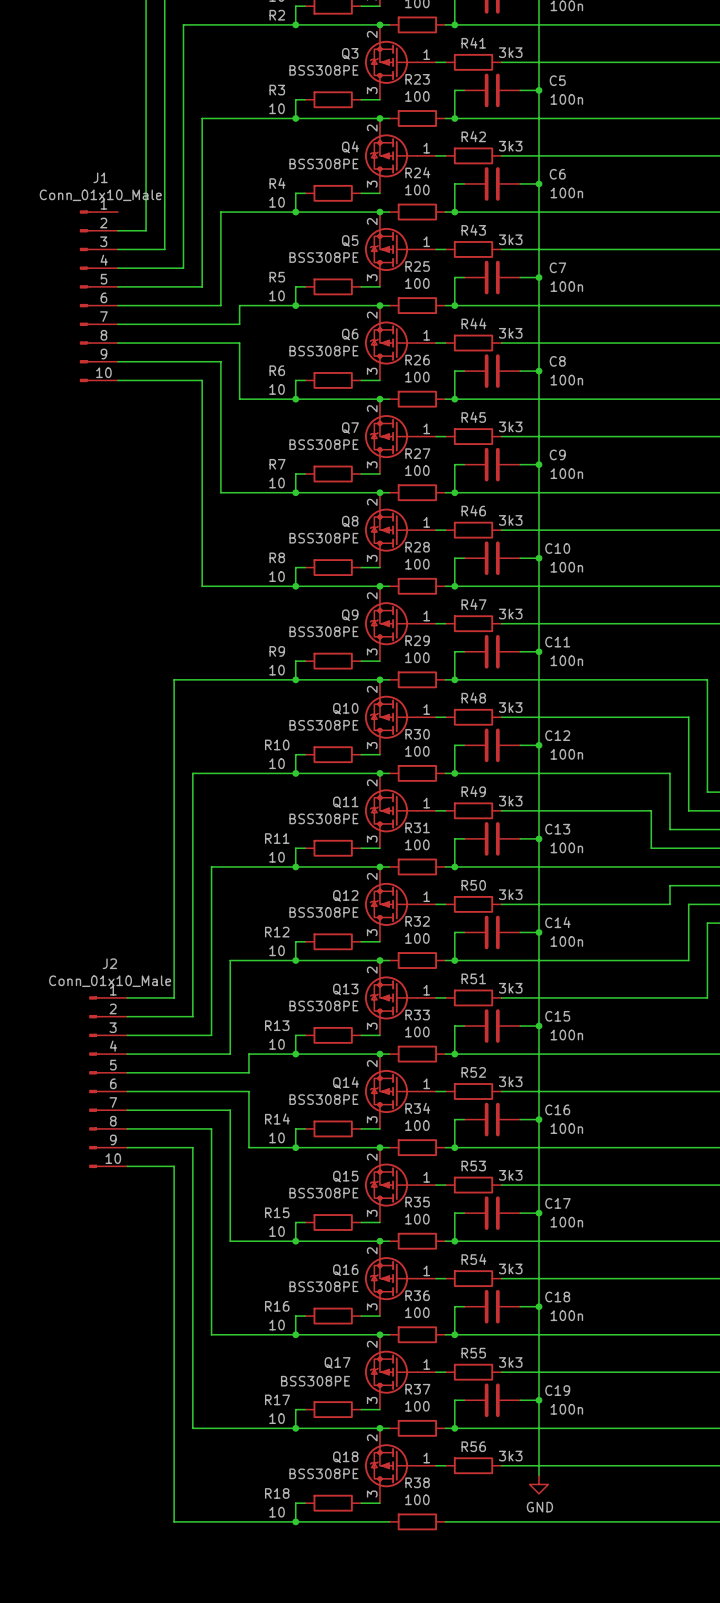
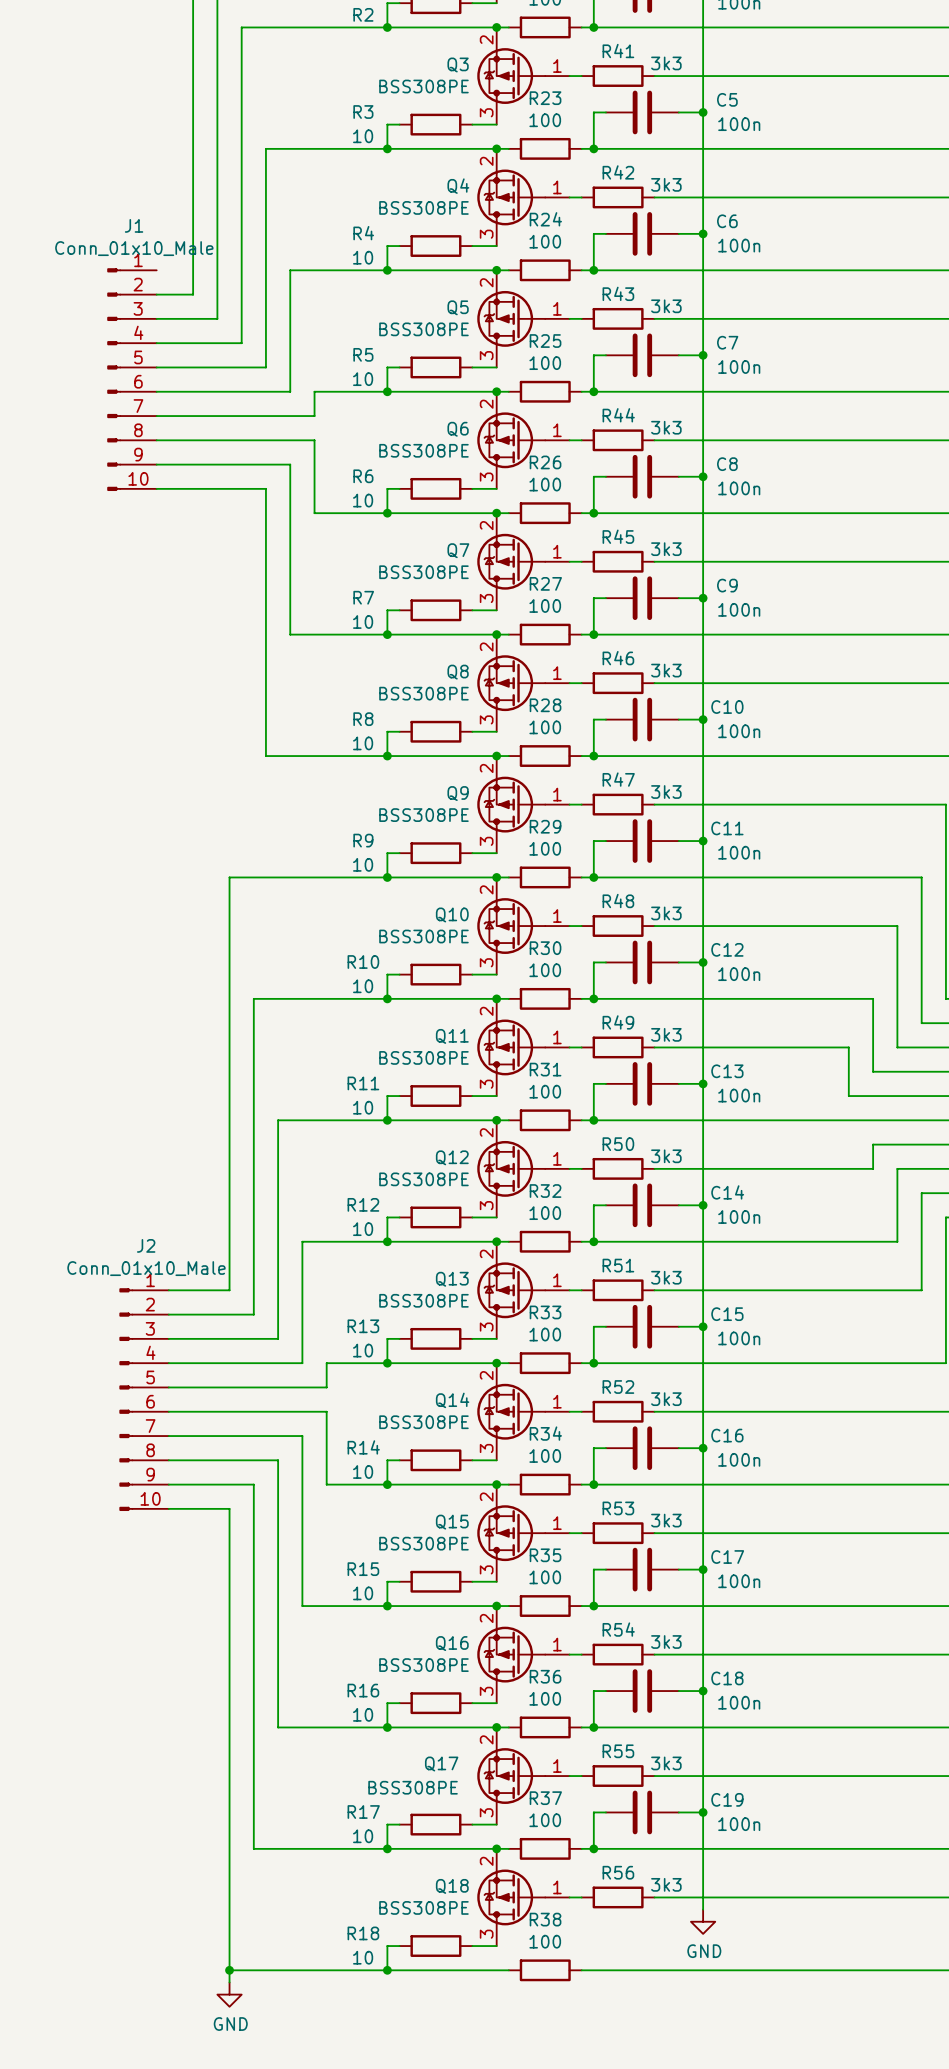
wire: none -> (229, 1970) (229, 1982)
junction: none -> (229, 1970)
power symbol: none -> GND (229, 1994)

